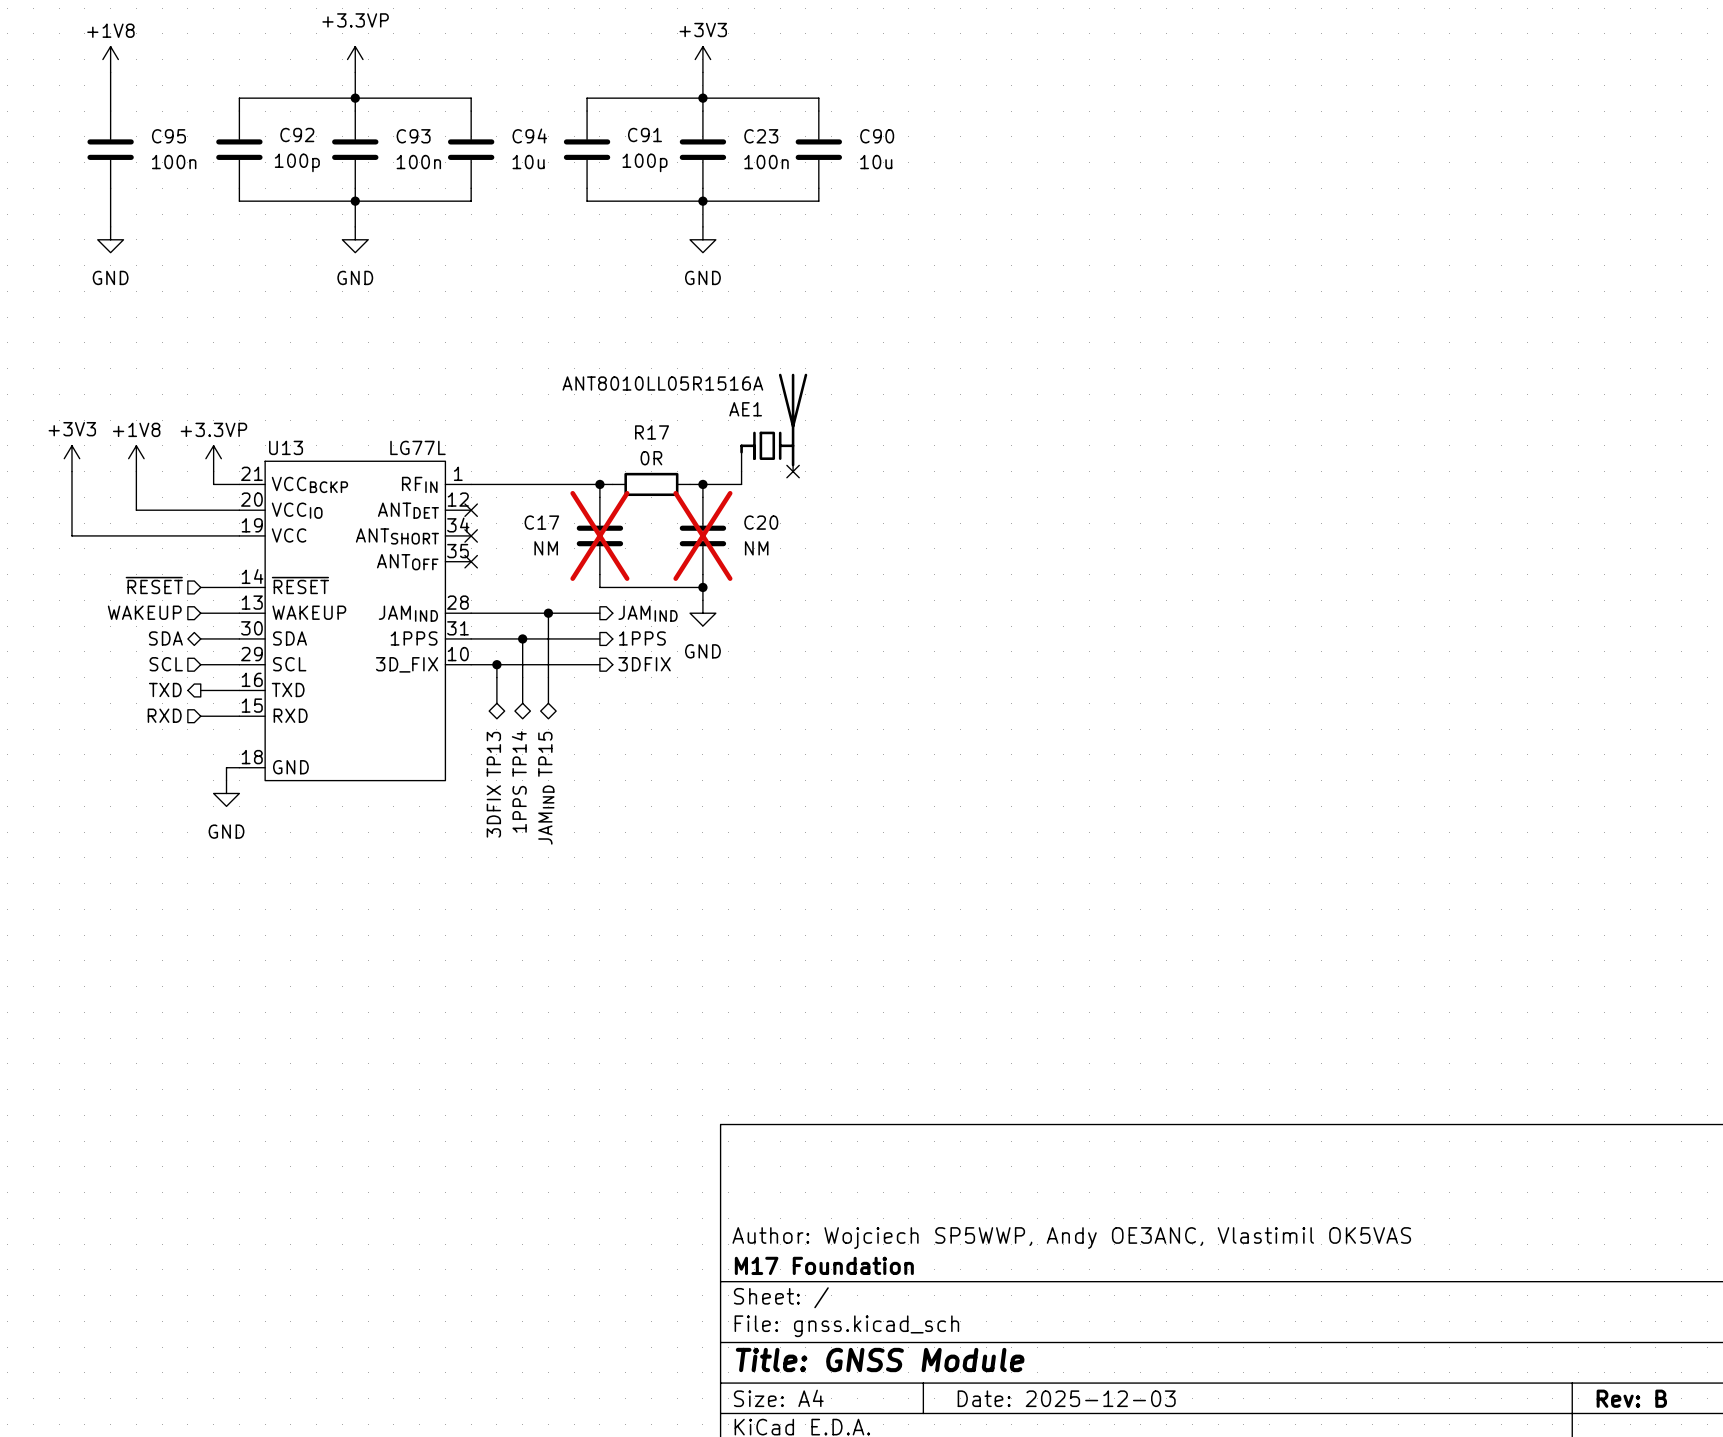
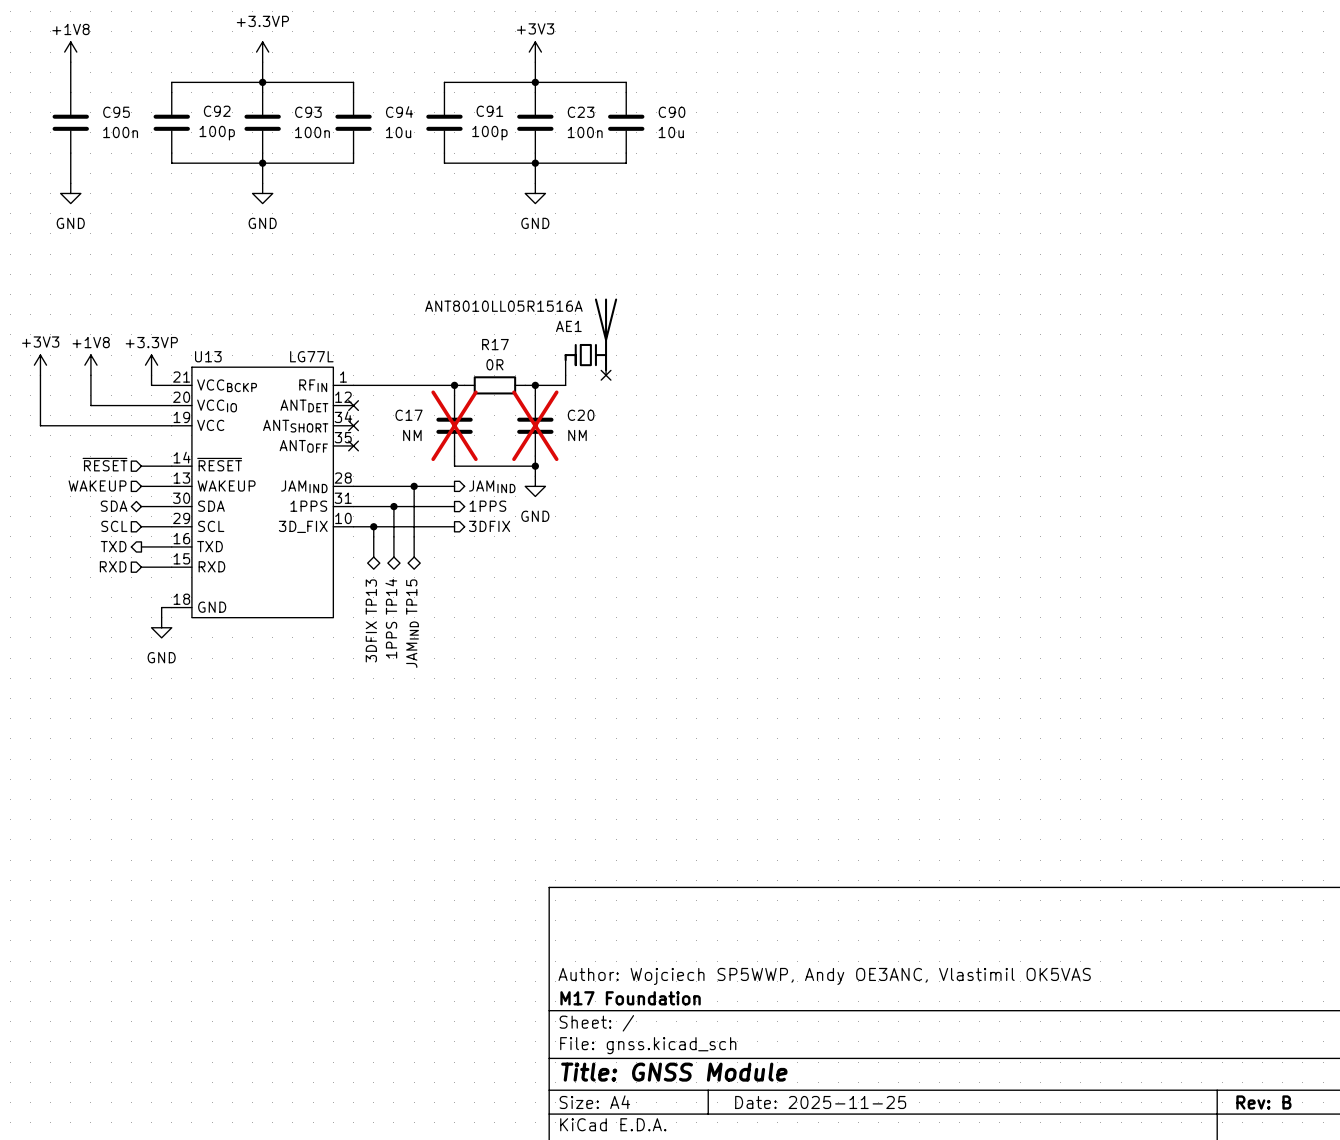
title block: Date: 2025-12-03 (1066, 1398) -> Date: 2025-11-25 (820, 1102)

